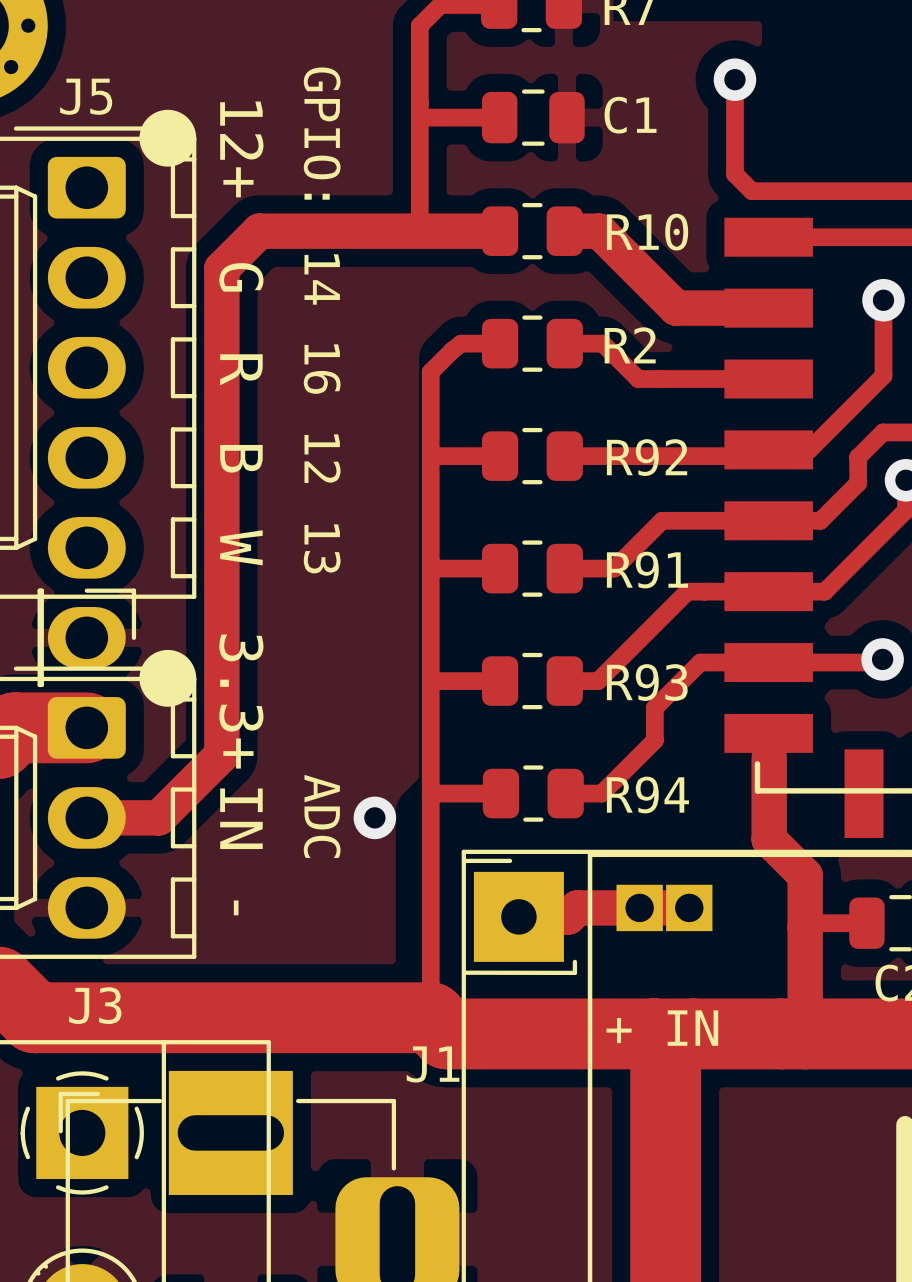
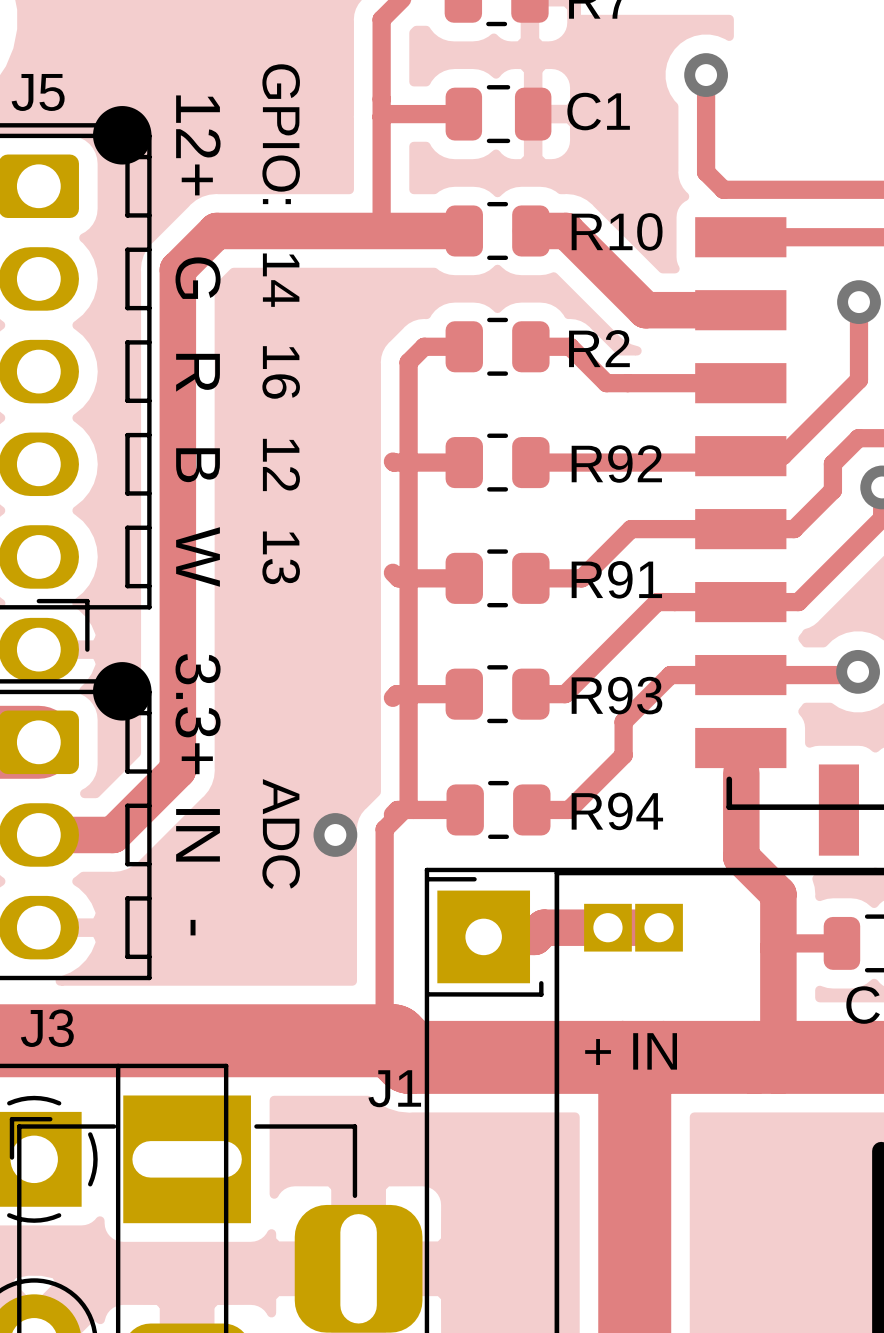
track: (461, 343) (430, 372) (430, 1017) -> (424, 346) (408, 362) (408, 805) (384, 829) (384, 1032)

